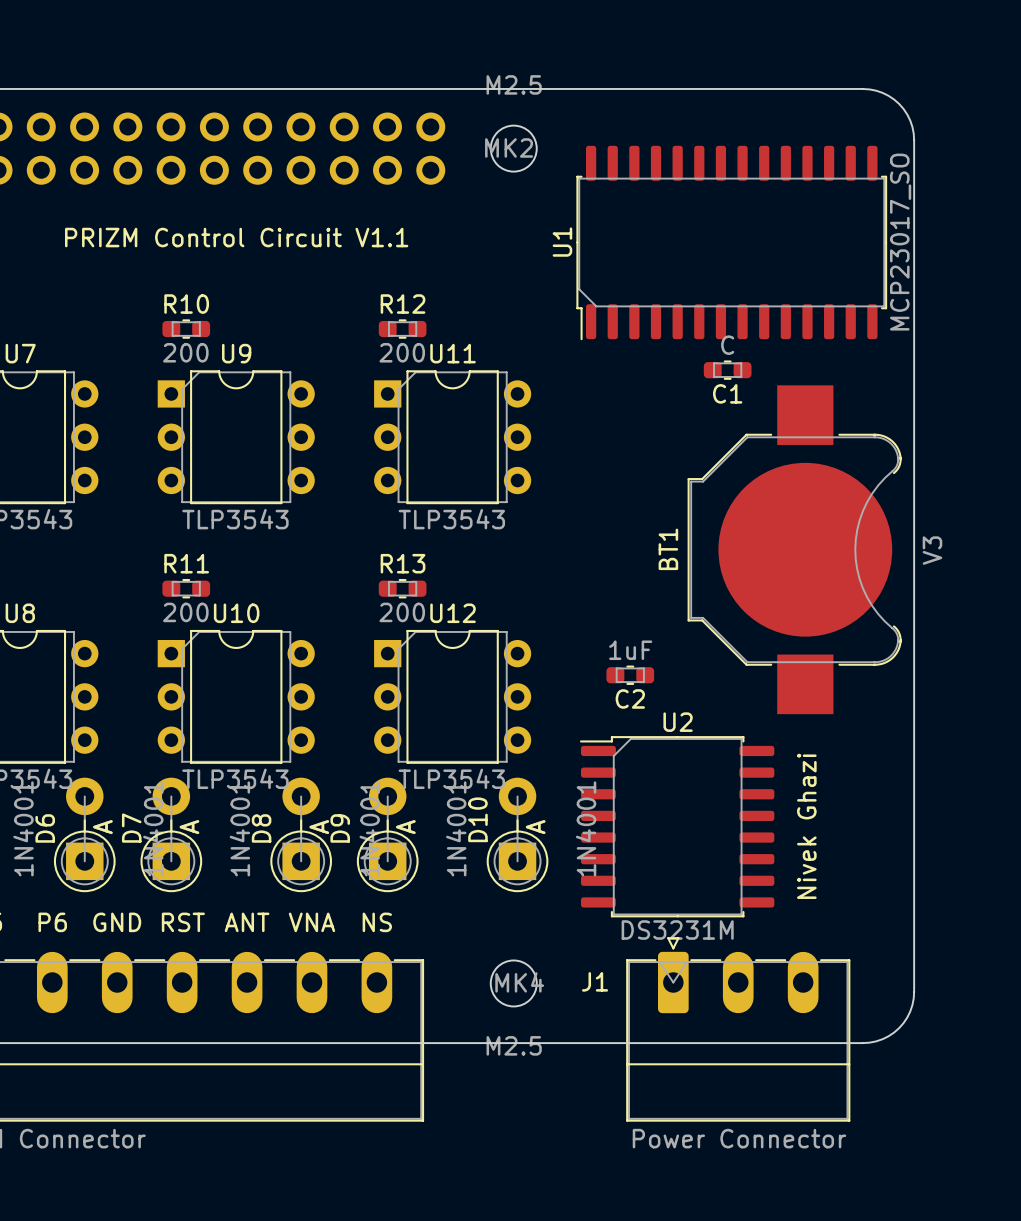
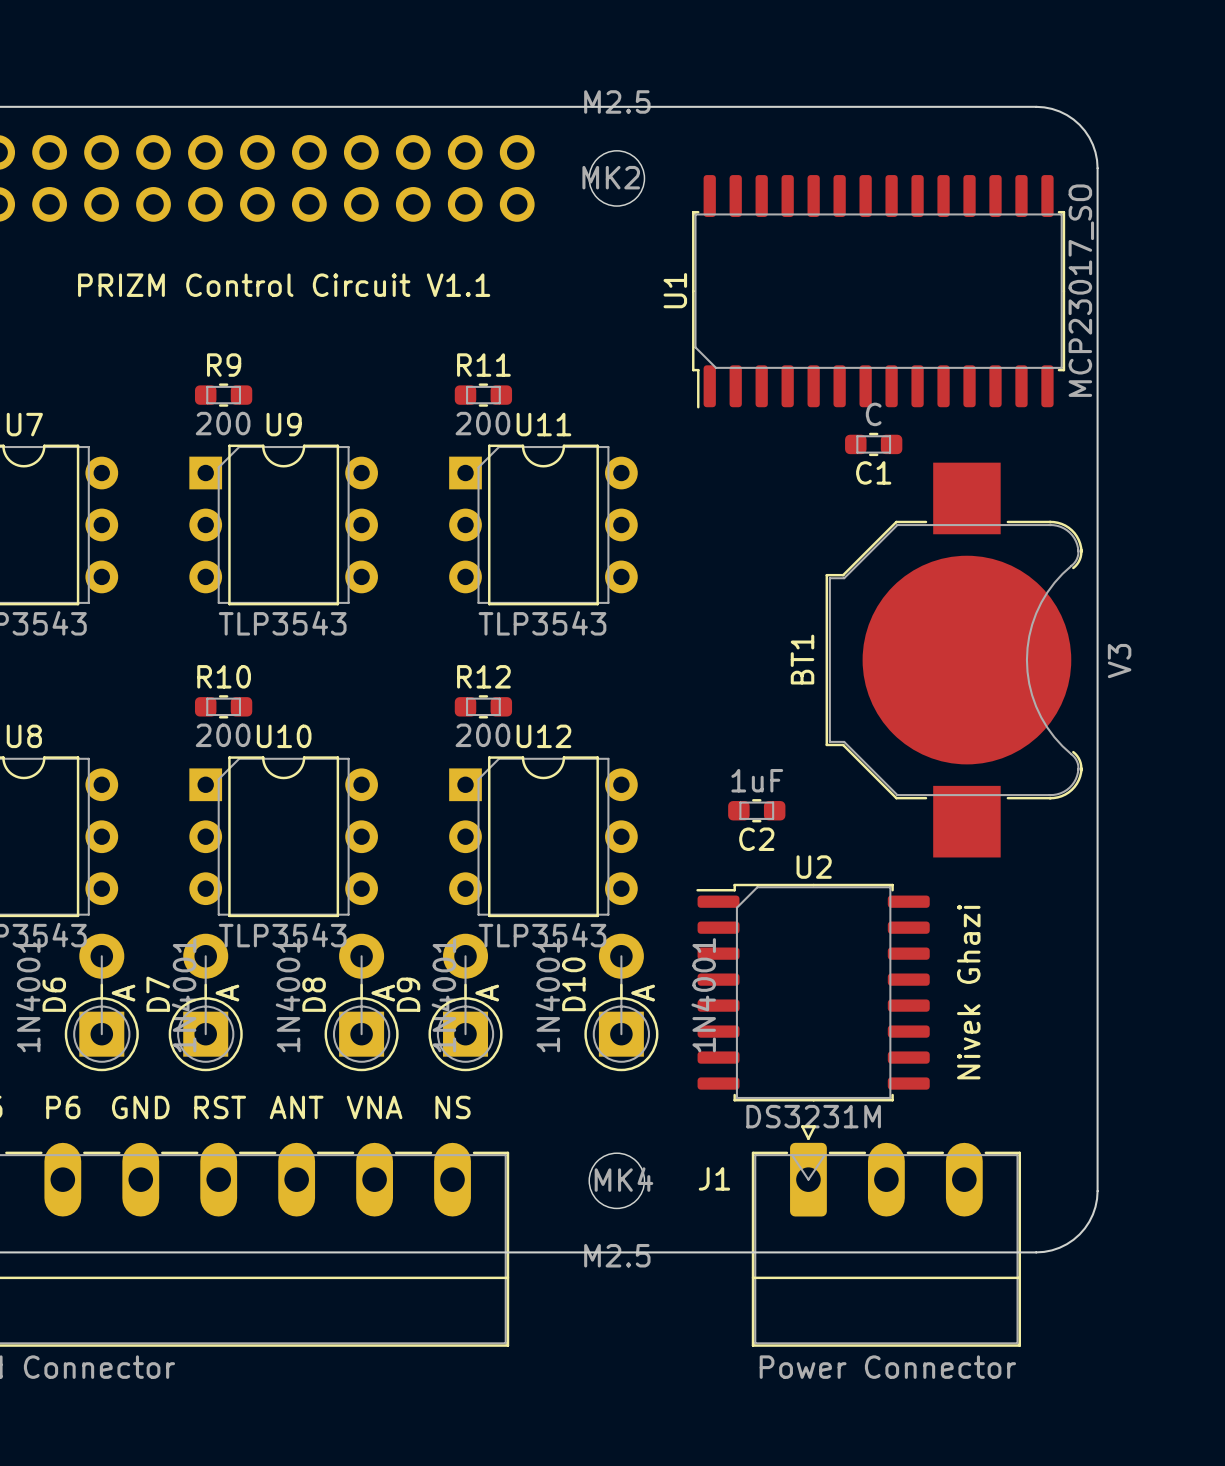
R10 name: R10 (186, 304) -> R9 (224, 365)
R12 name: R12 (403, 304) -> R11 (483, 365)
R11 name: R11 (186, 563) -> R10 (224, 676)
R13 name: R13 (403, 563) -> R12 (483, 676)

